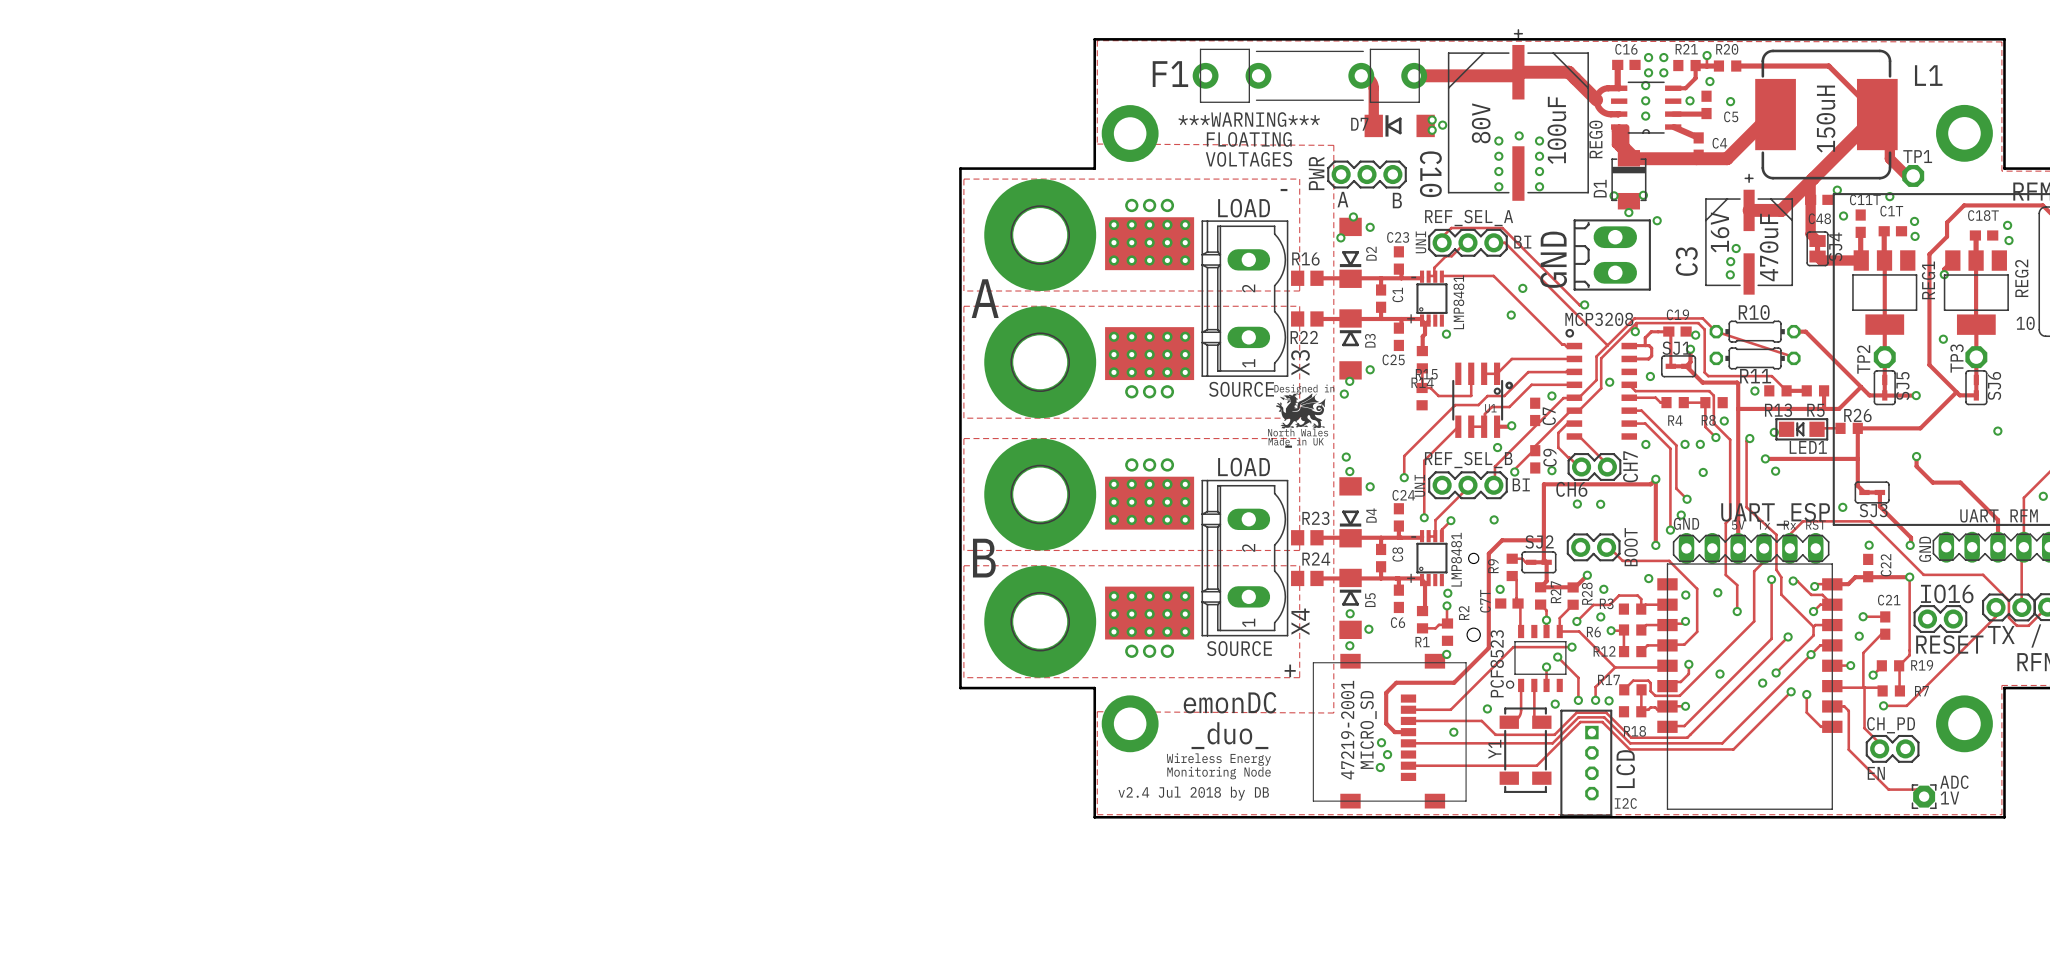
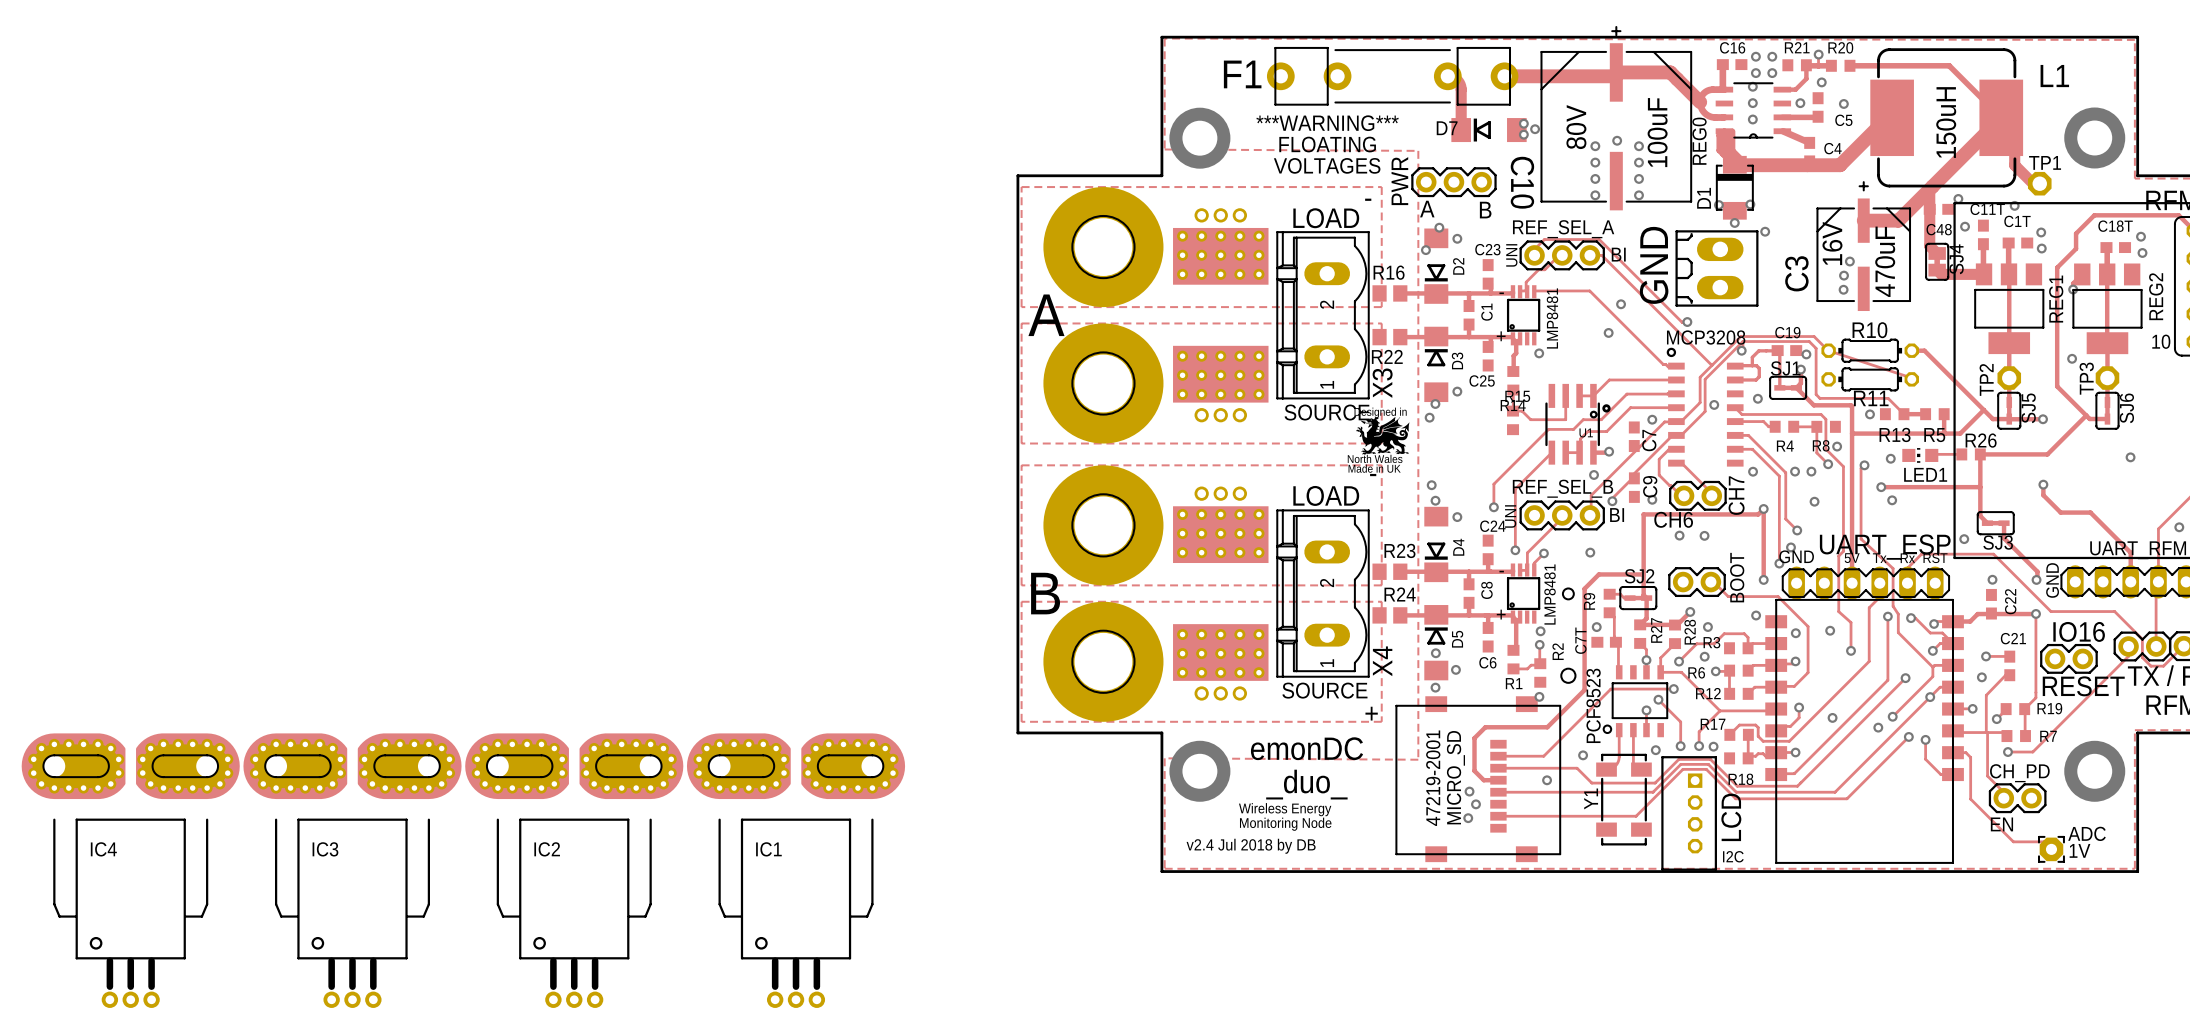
LED1 footprint: [1775, 418, 1829, 441] -> [1902, 448, 1939, 463]
IC4: none -> (130, 870)
IC3: none -> (352, 870)
IC2: none -> (574, 870)
IC1: none -> (796, 870)

